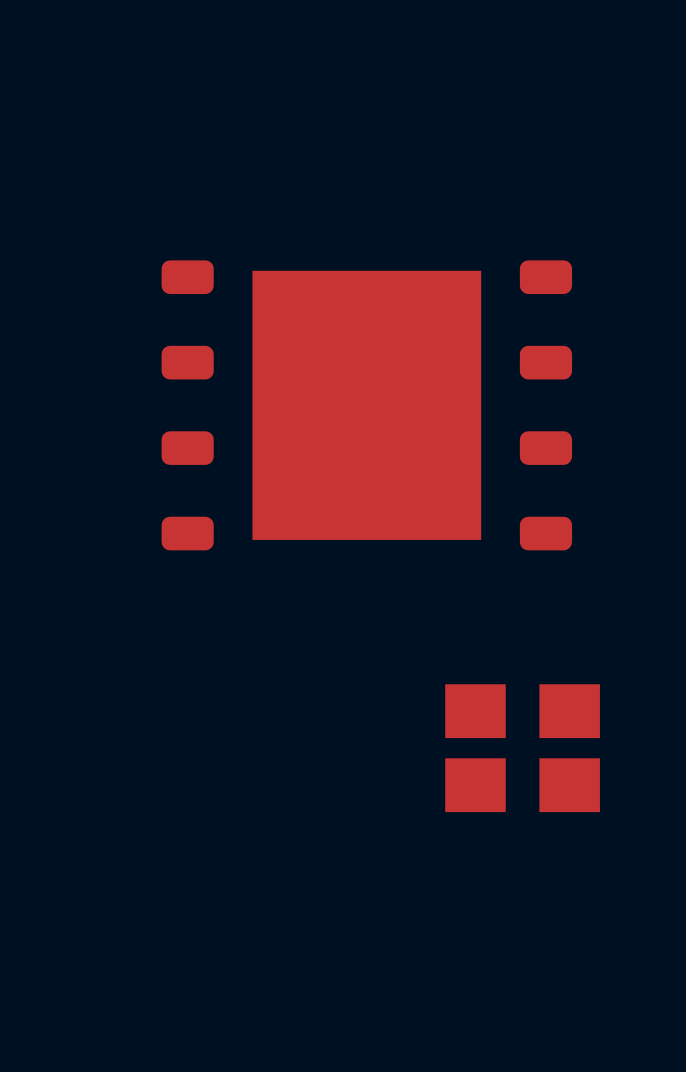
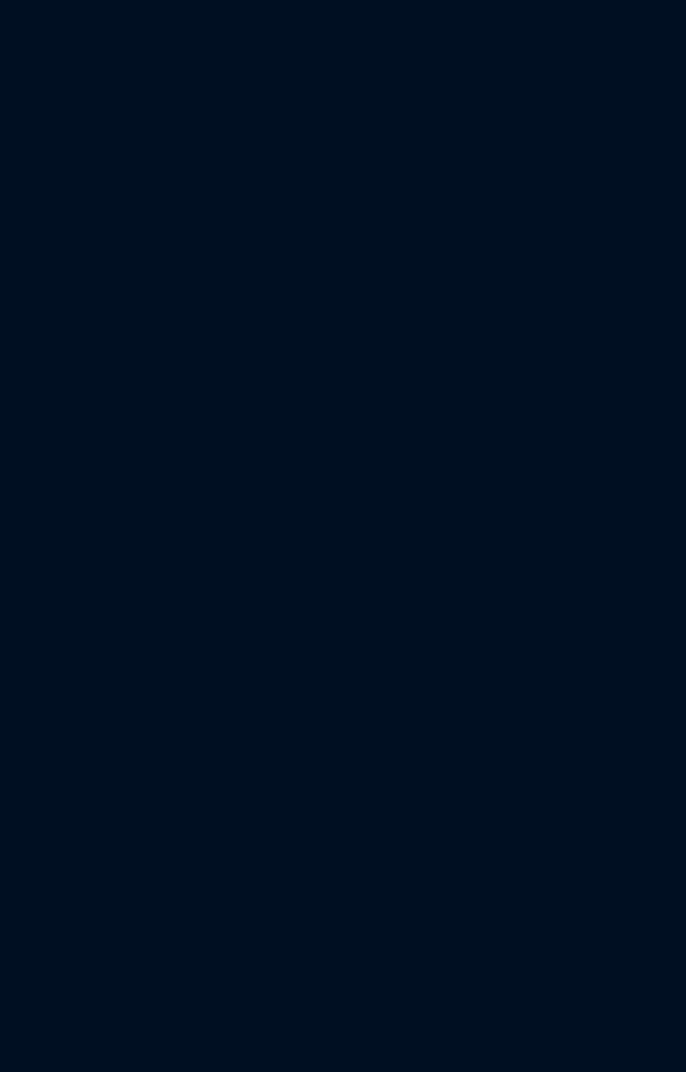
part: (366, 405) -> none
part: (522, 748) -> none

